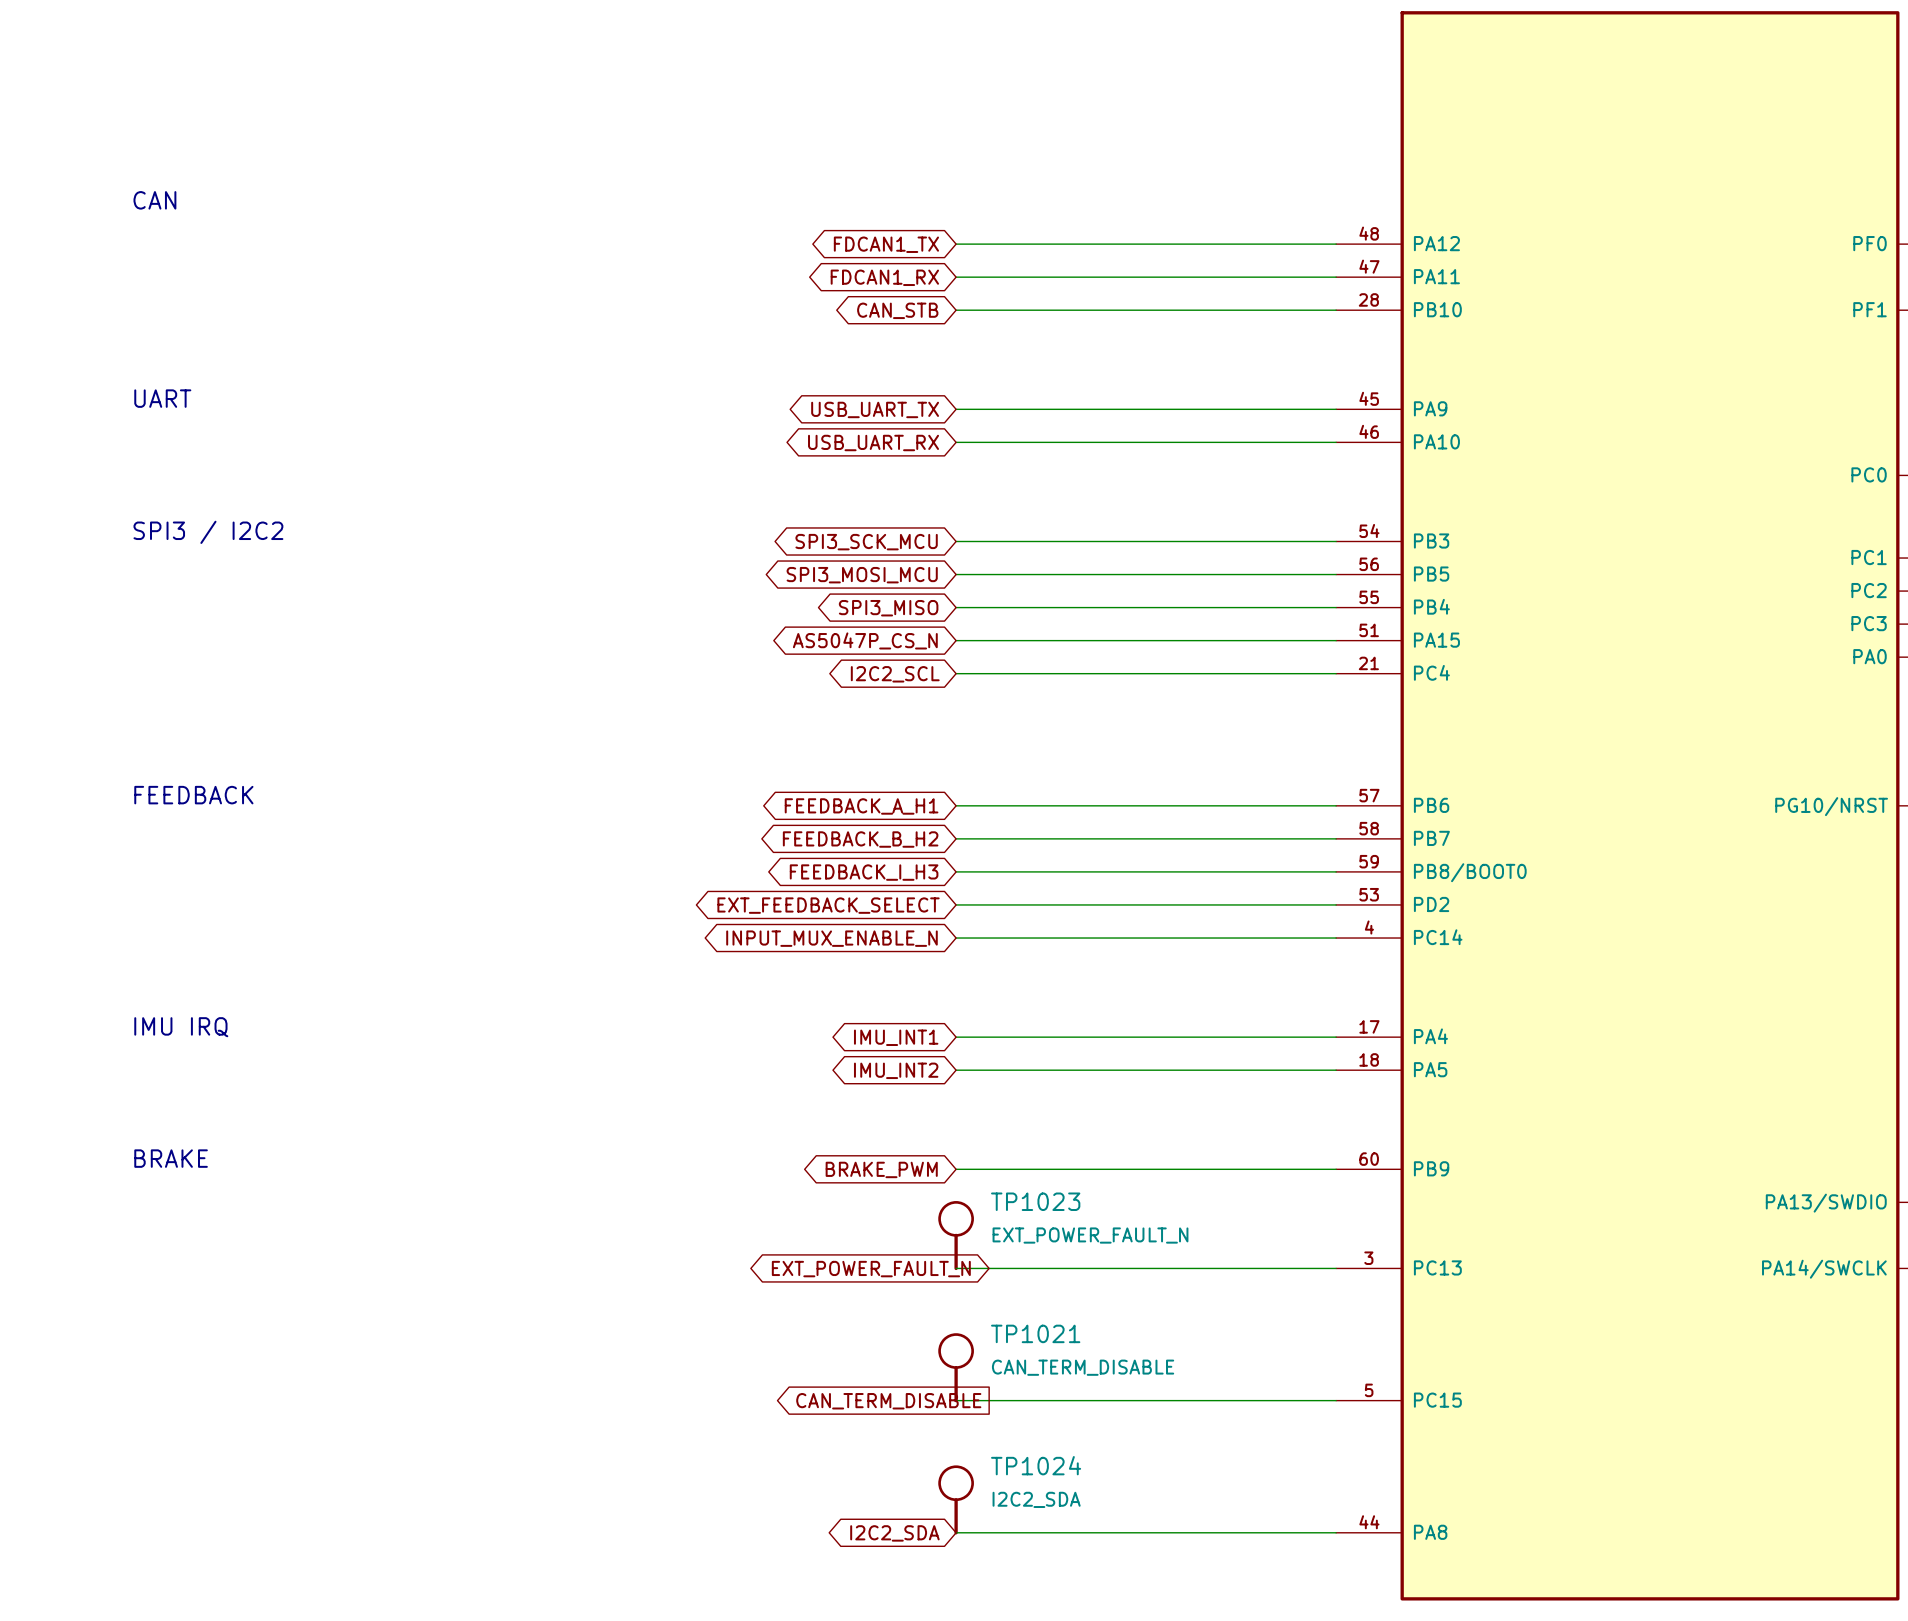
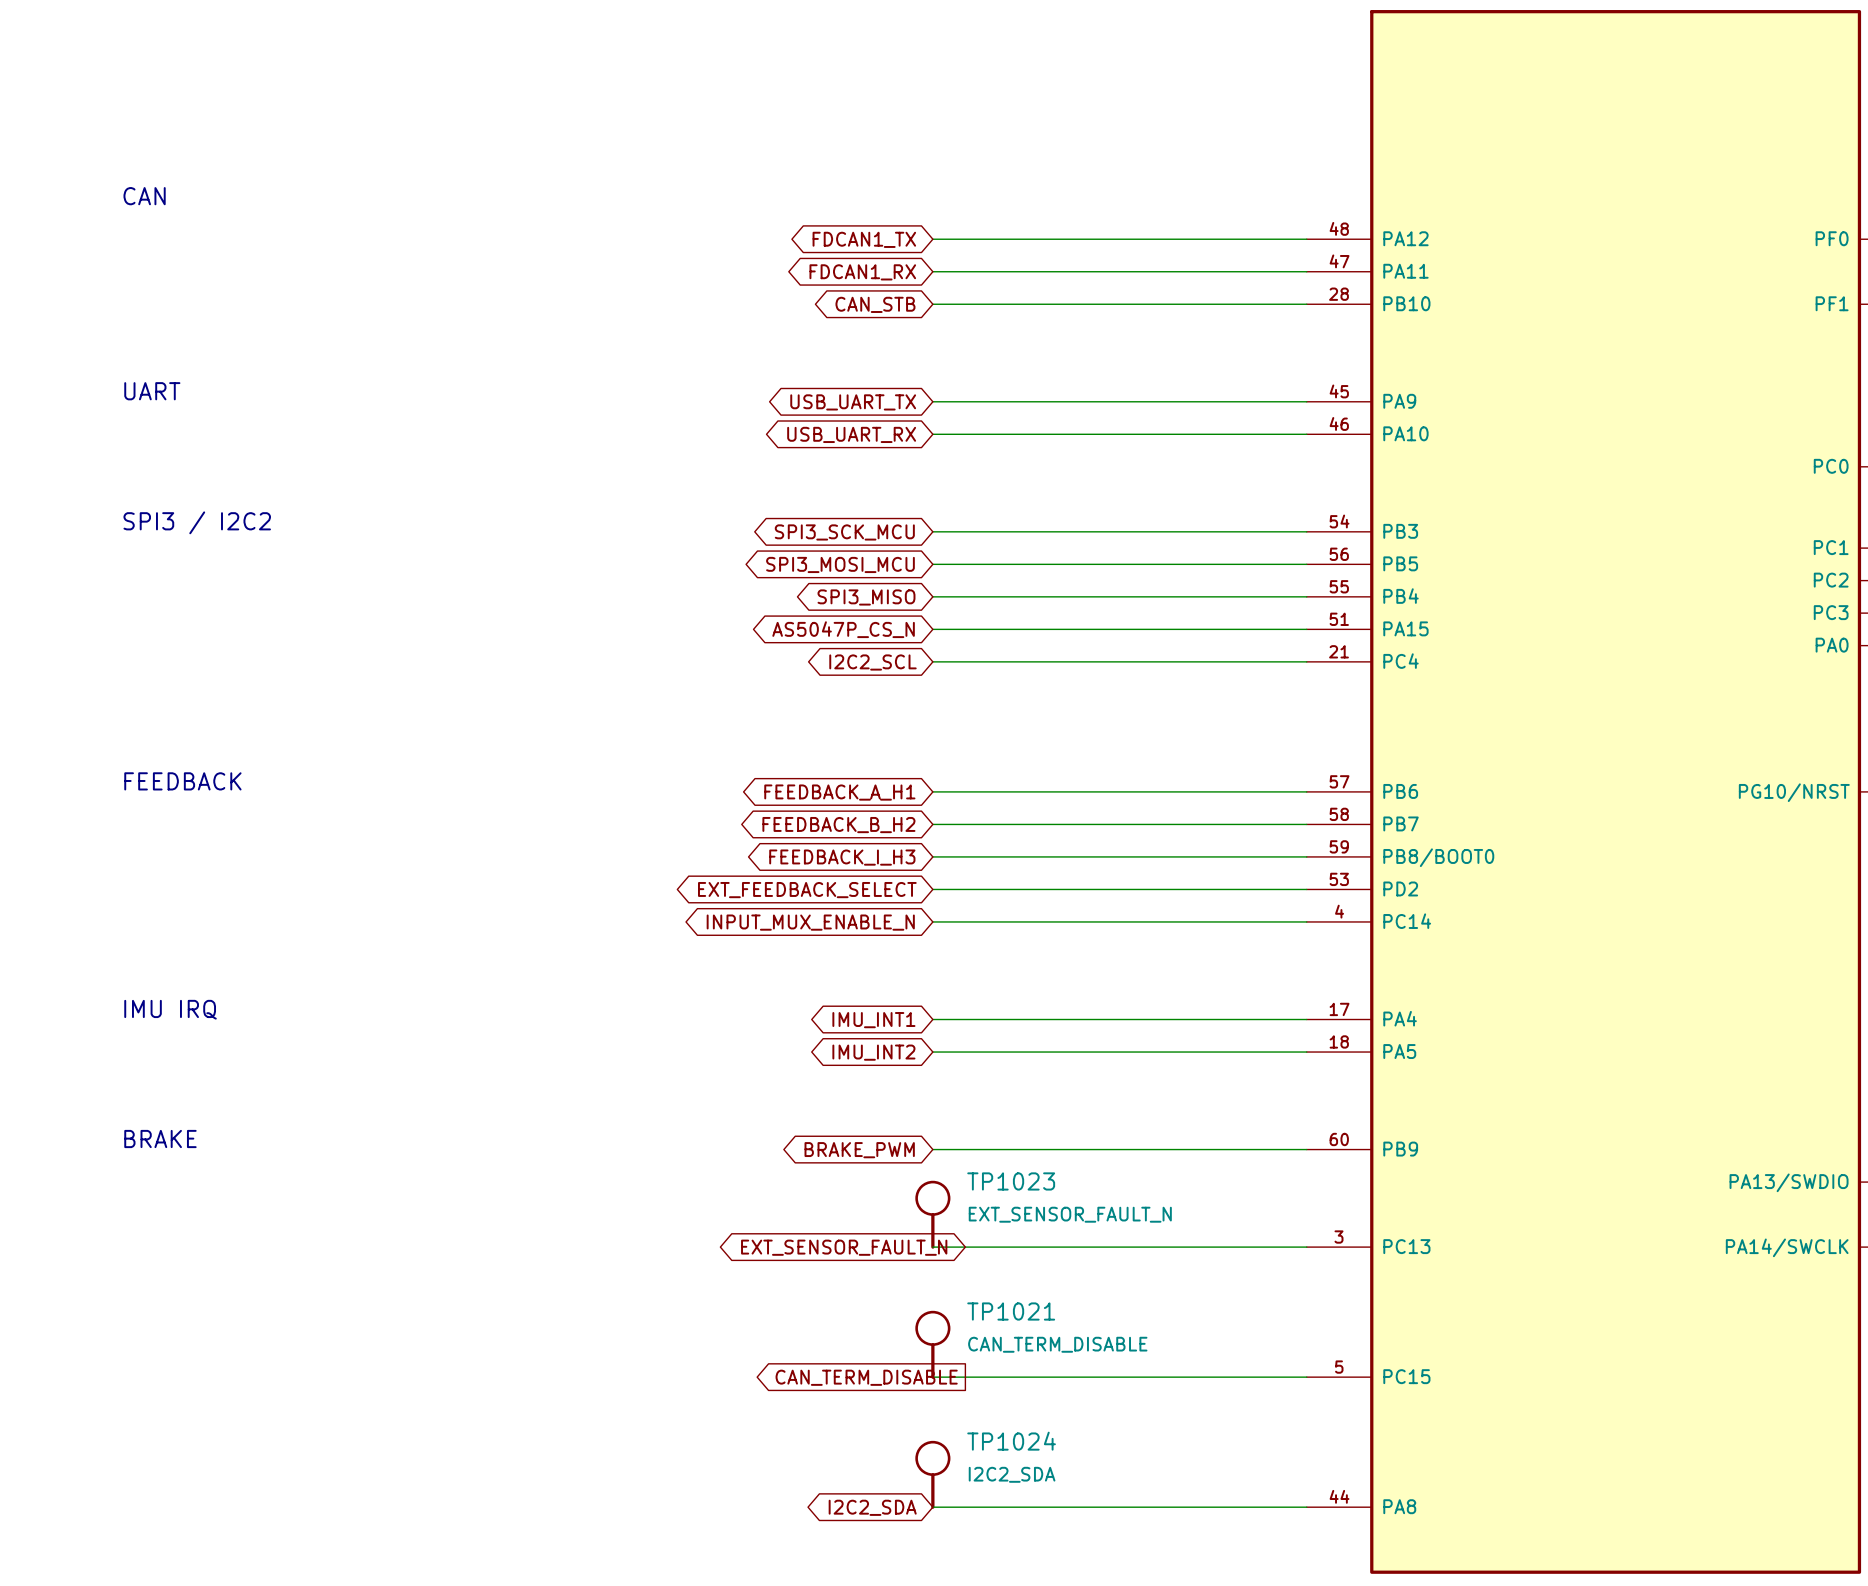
TP1023 value: EXT_POWER_FAULT_N (1090, 1235) -> EXT_SENSOR_FAULT_N (1070, 1214)
global label: EXT_POWER_FAULT_N (871, 1269) -> EXT_SENSOR_FAULT_N (844, 1247)

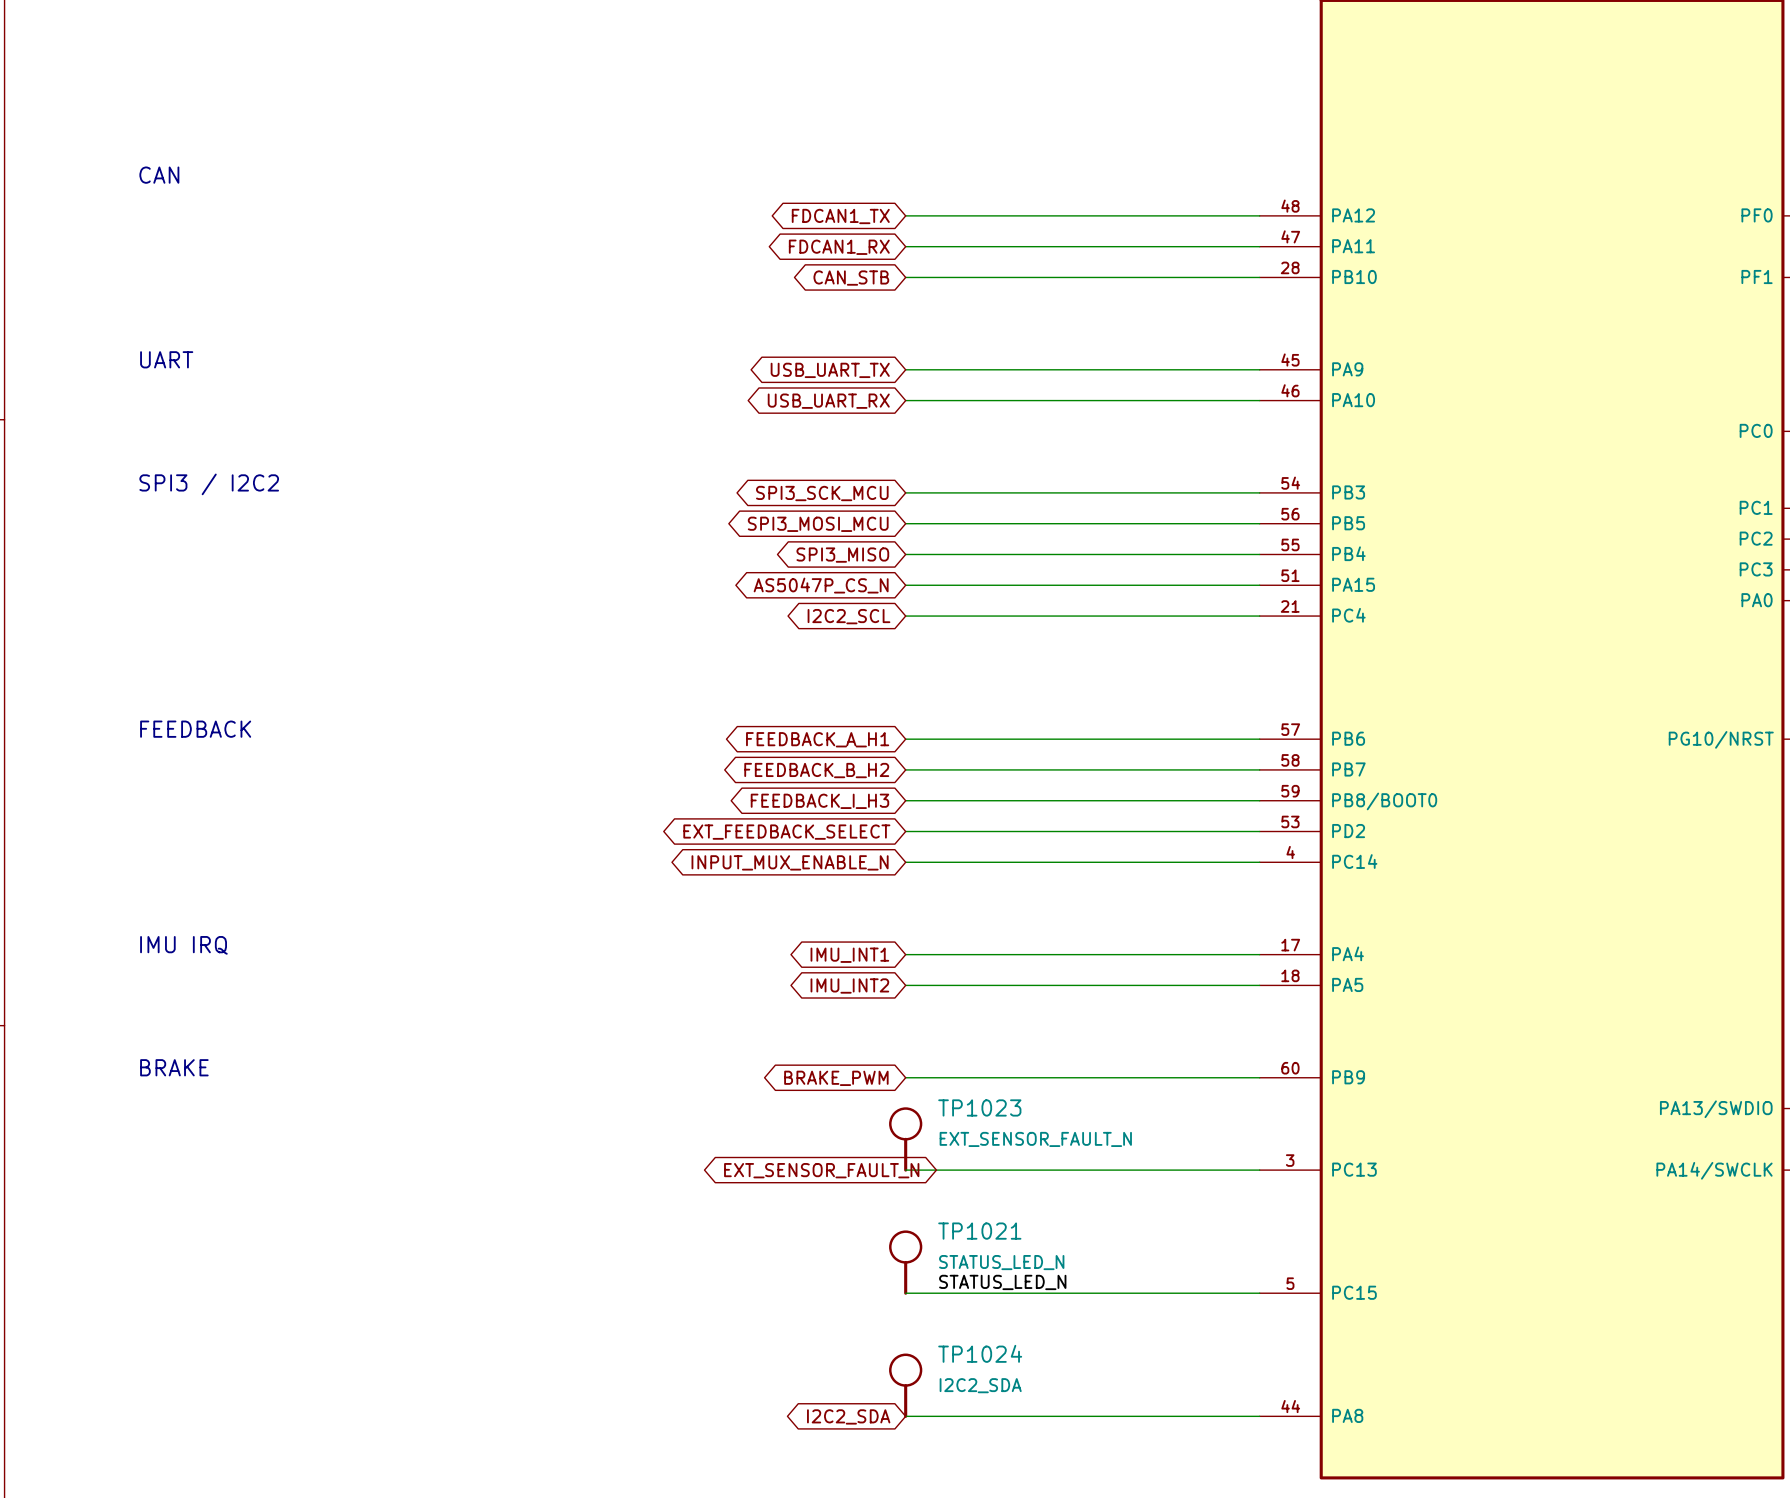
TP1021 value: CAN_TERM_DISABLE (1057, 1344) -> STATUS_LED_N (1001, 1262)
label: none -> STATUS_LED_N (1002, 1282)
global label: CAN_TERM_DISABLE (866, 1377) -> none

